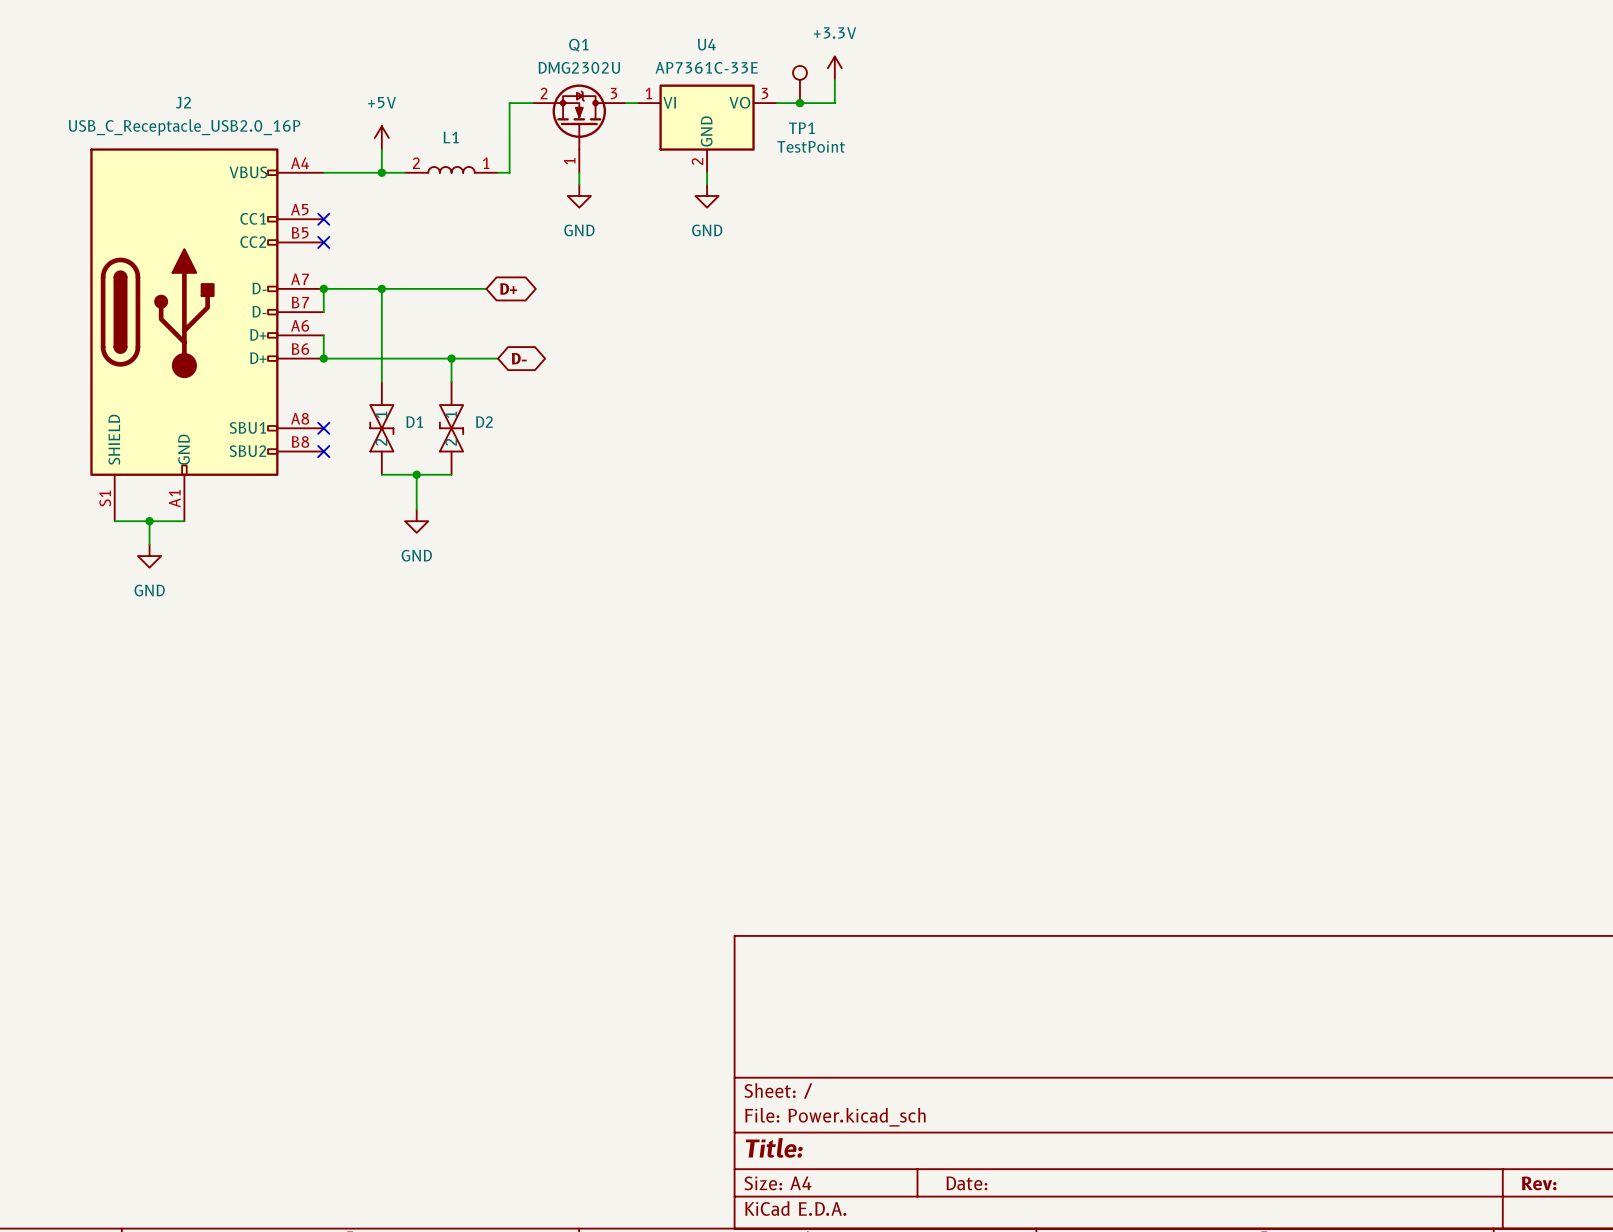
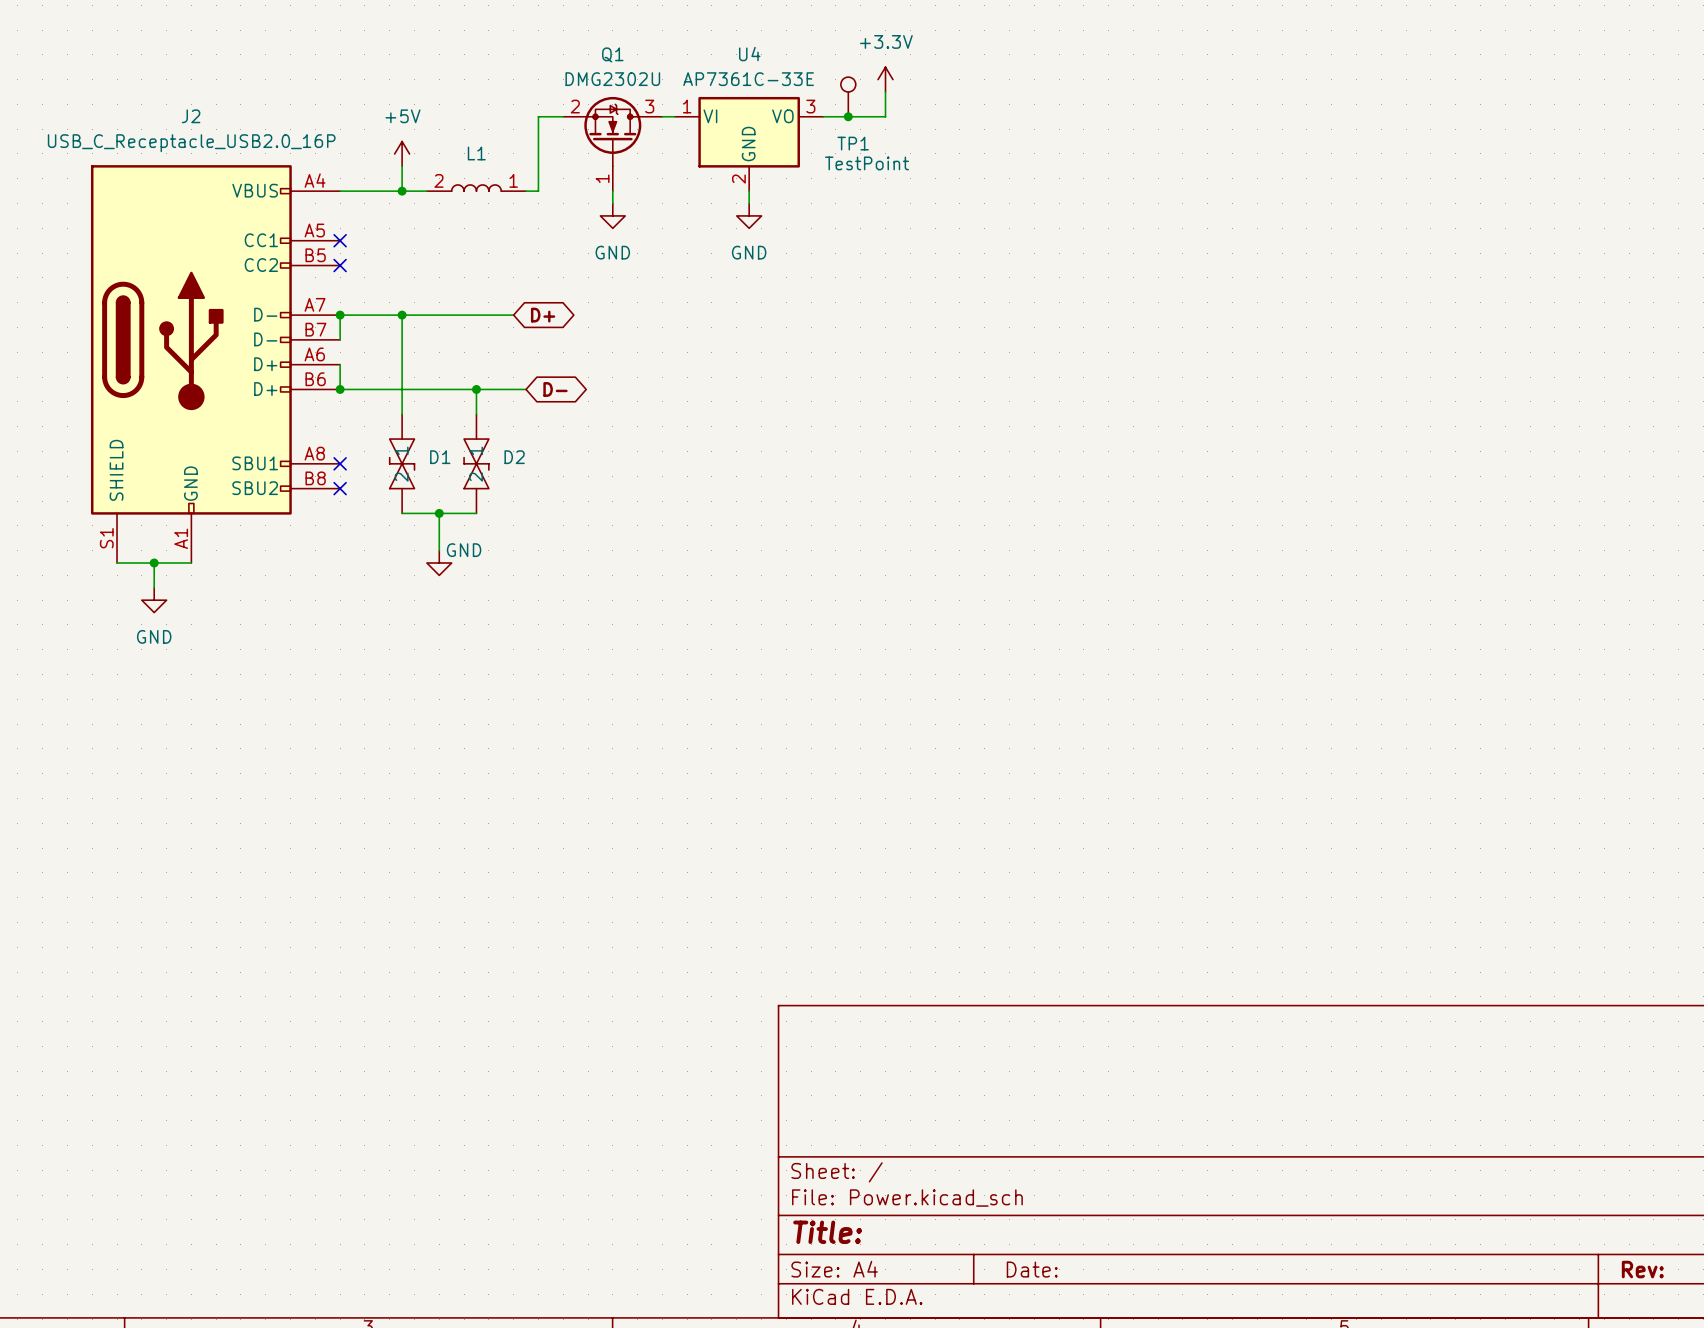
power symbol text position: GND (416, 555) -> GND (464, 550)

